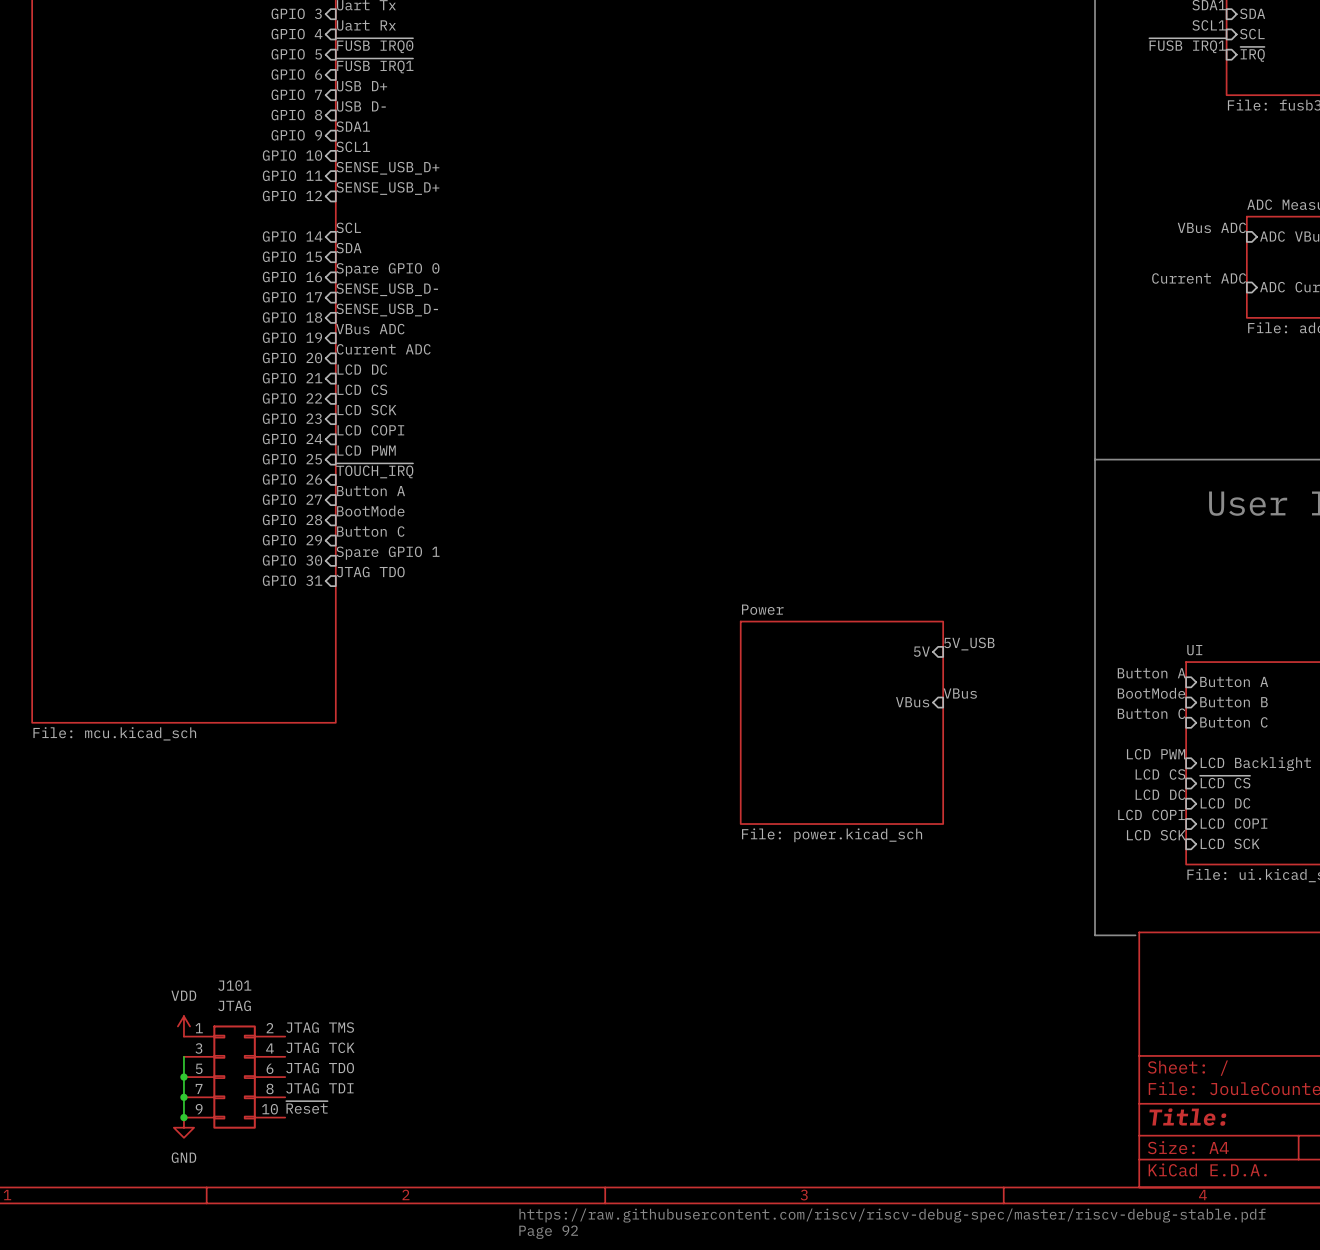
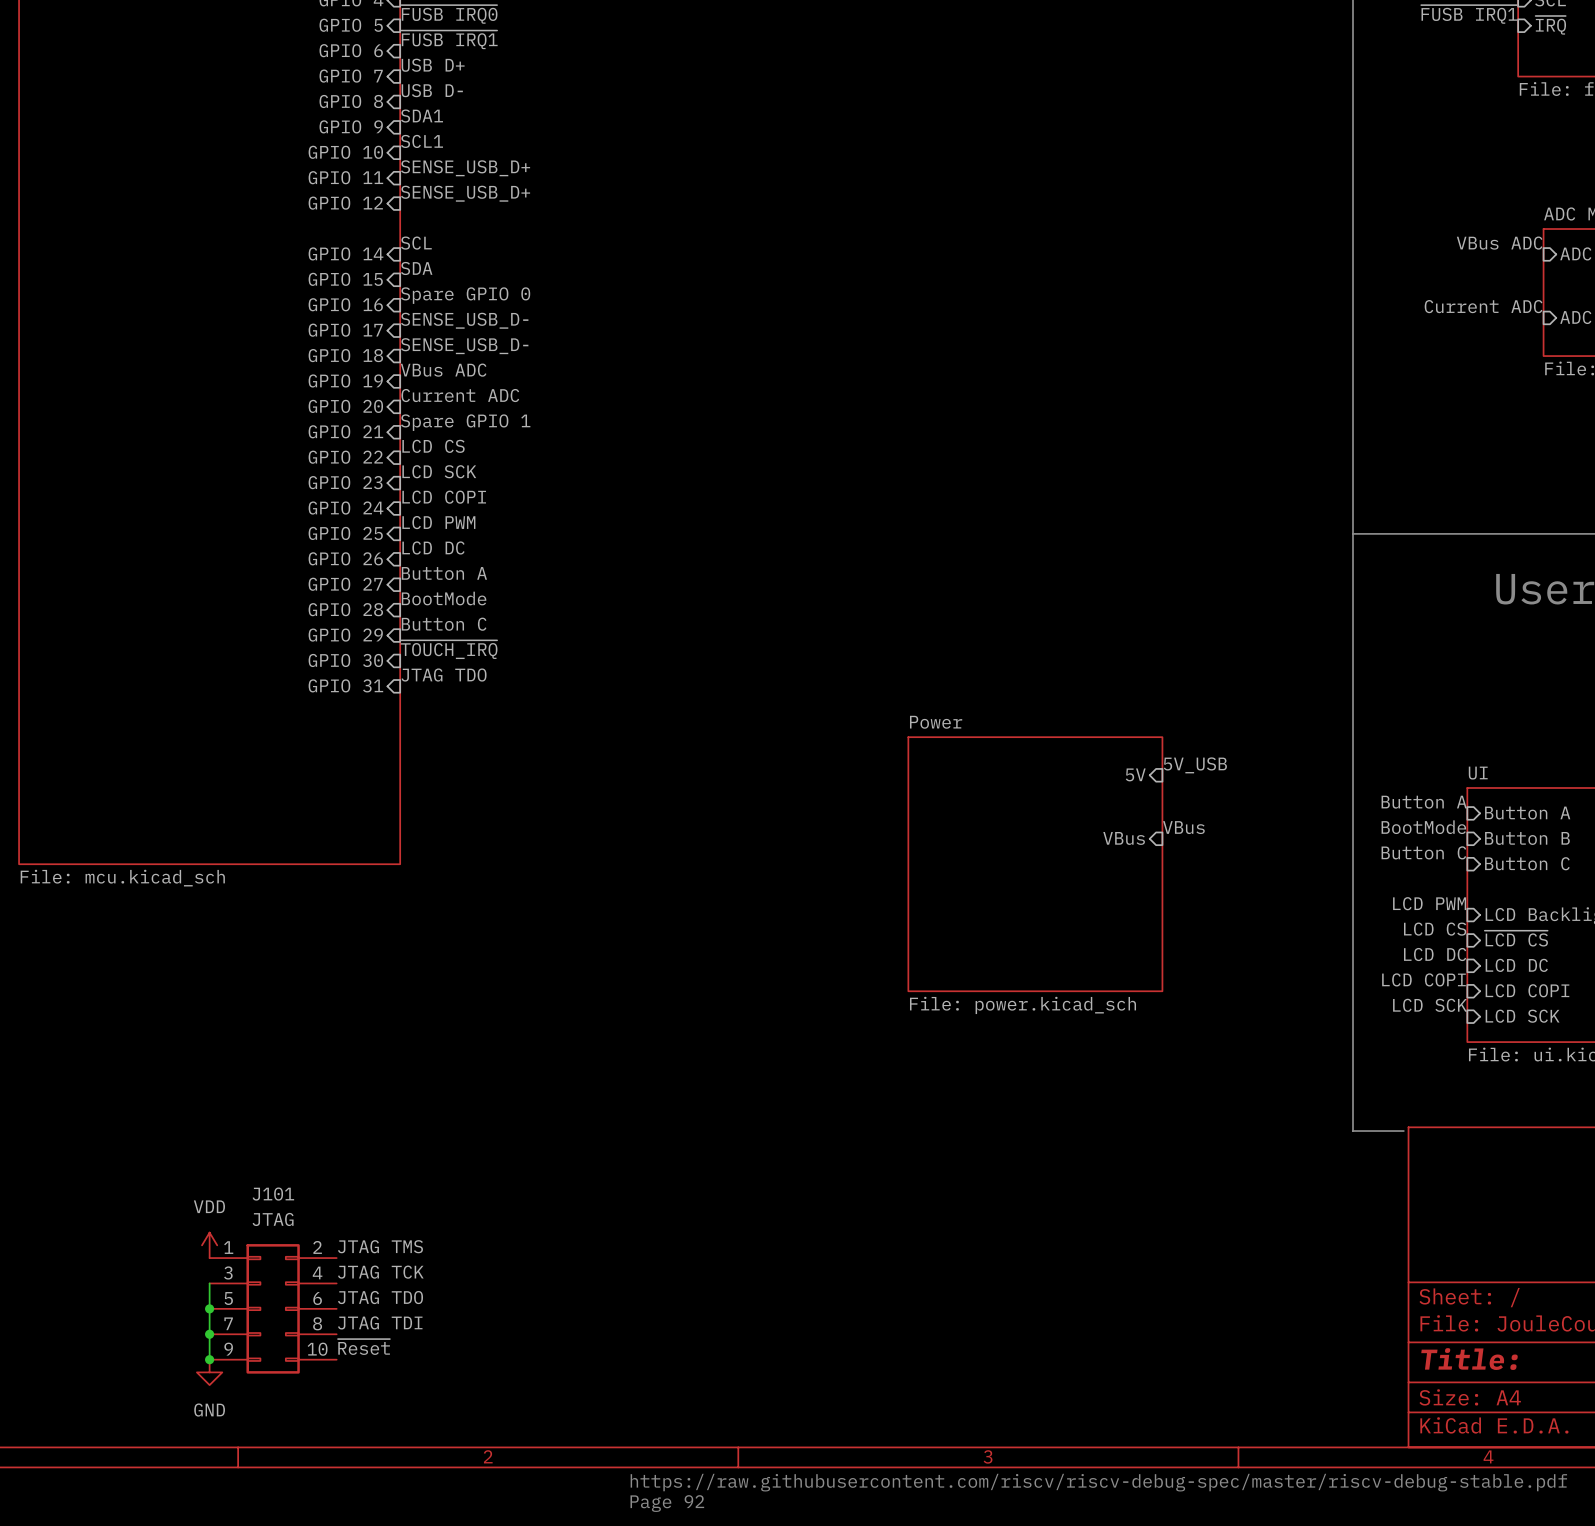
label: LCD DC (362, 369) -> Spare GPIO 1 (465, 422)
label: ~{TOUCH_IRQ} (374, 470) -> LCD DC (433, 547)
label: Spare GPIO 1 (388, 553) -> ~{TOUCH_IRQ} (449, 649)

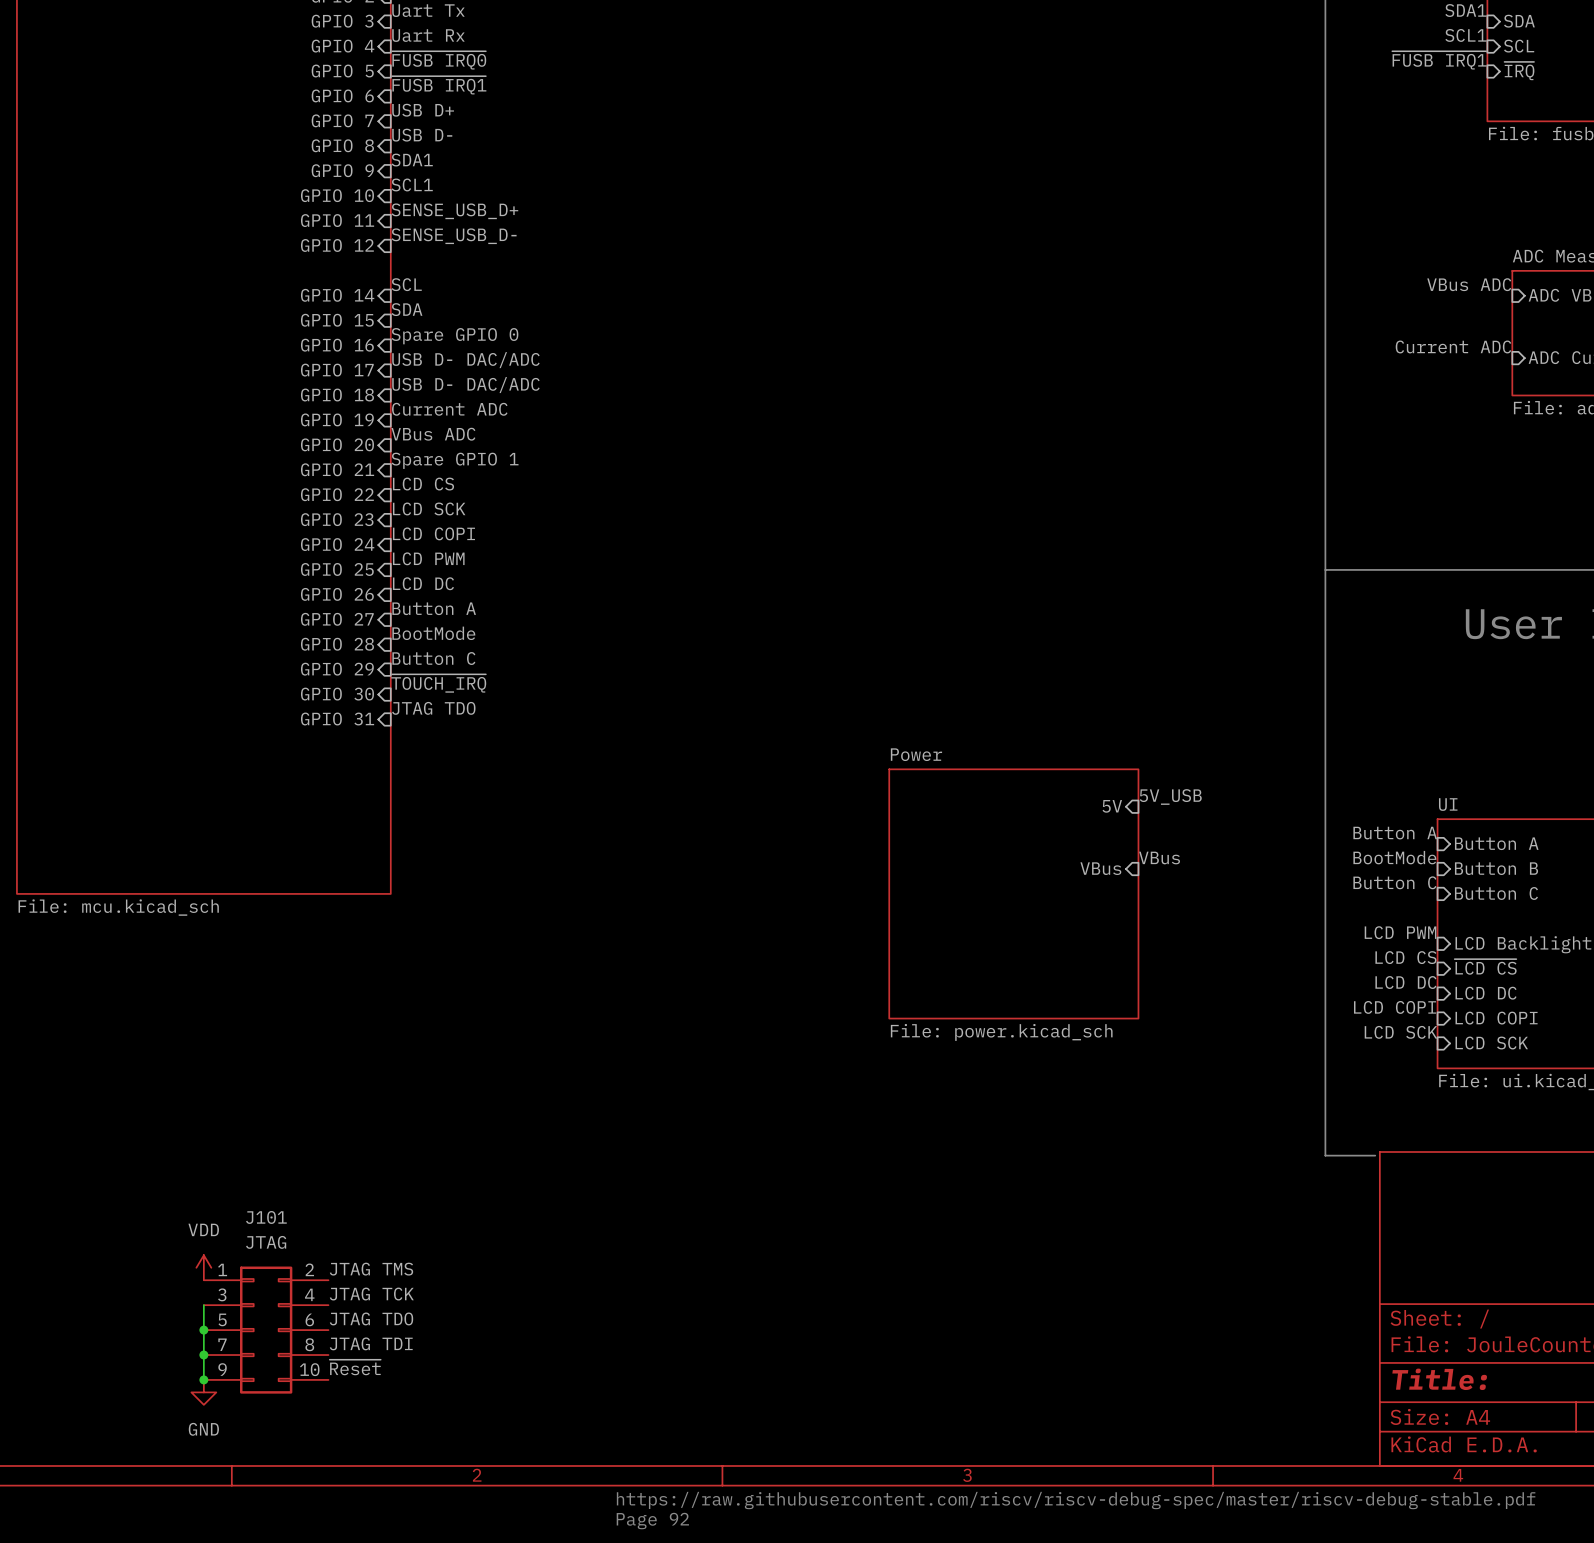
label: SENSE_USB_D+ (465, 193) -> SENSE_USB_D- (454, 236)
label: SENSE_USB_D- (464, 320) -> USB D- DAC/ADC (465, 360)
label: SENSE_USB_D- (464, 346) -> USB D- DAC/ADC (465, 385)
label: VBus ADC (443, 370) -> Current ADC (449, 409)
label: Current ADC (460, 395) -> VBus ADC (433, 434)

